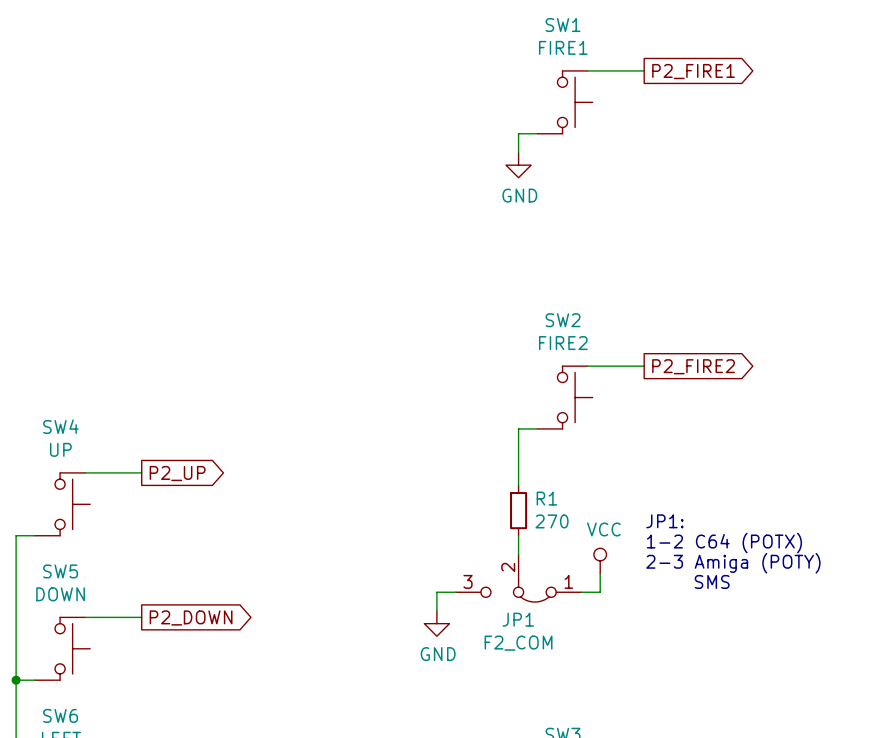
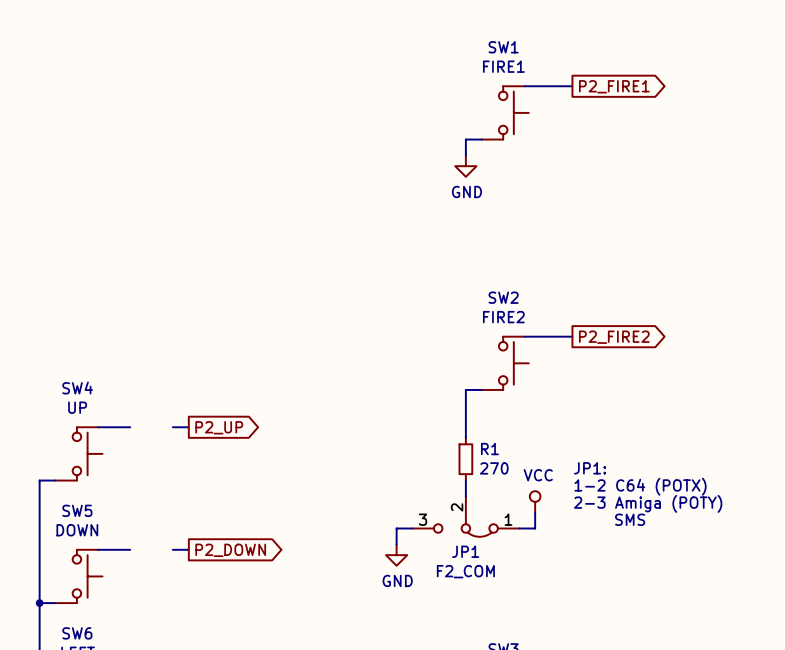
wire: (122, 472) (141, 472) -> (172, 427) (188, 427)
global label position: P2_UP (177, 473) -> P2_UP (219, 427)
wire: (122, 617) (141, 617) -> (172, 549) (188, 549)
global label position: P2_DOWN (191, 617) -> P2_DOWN (230, 550)

